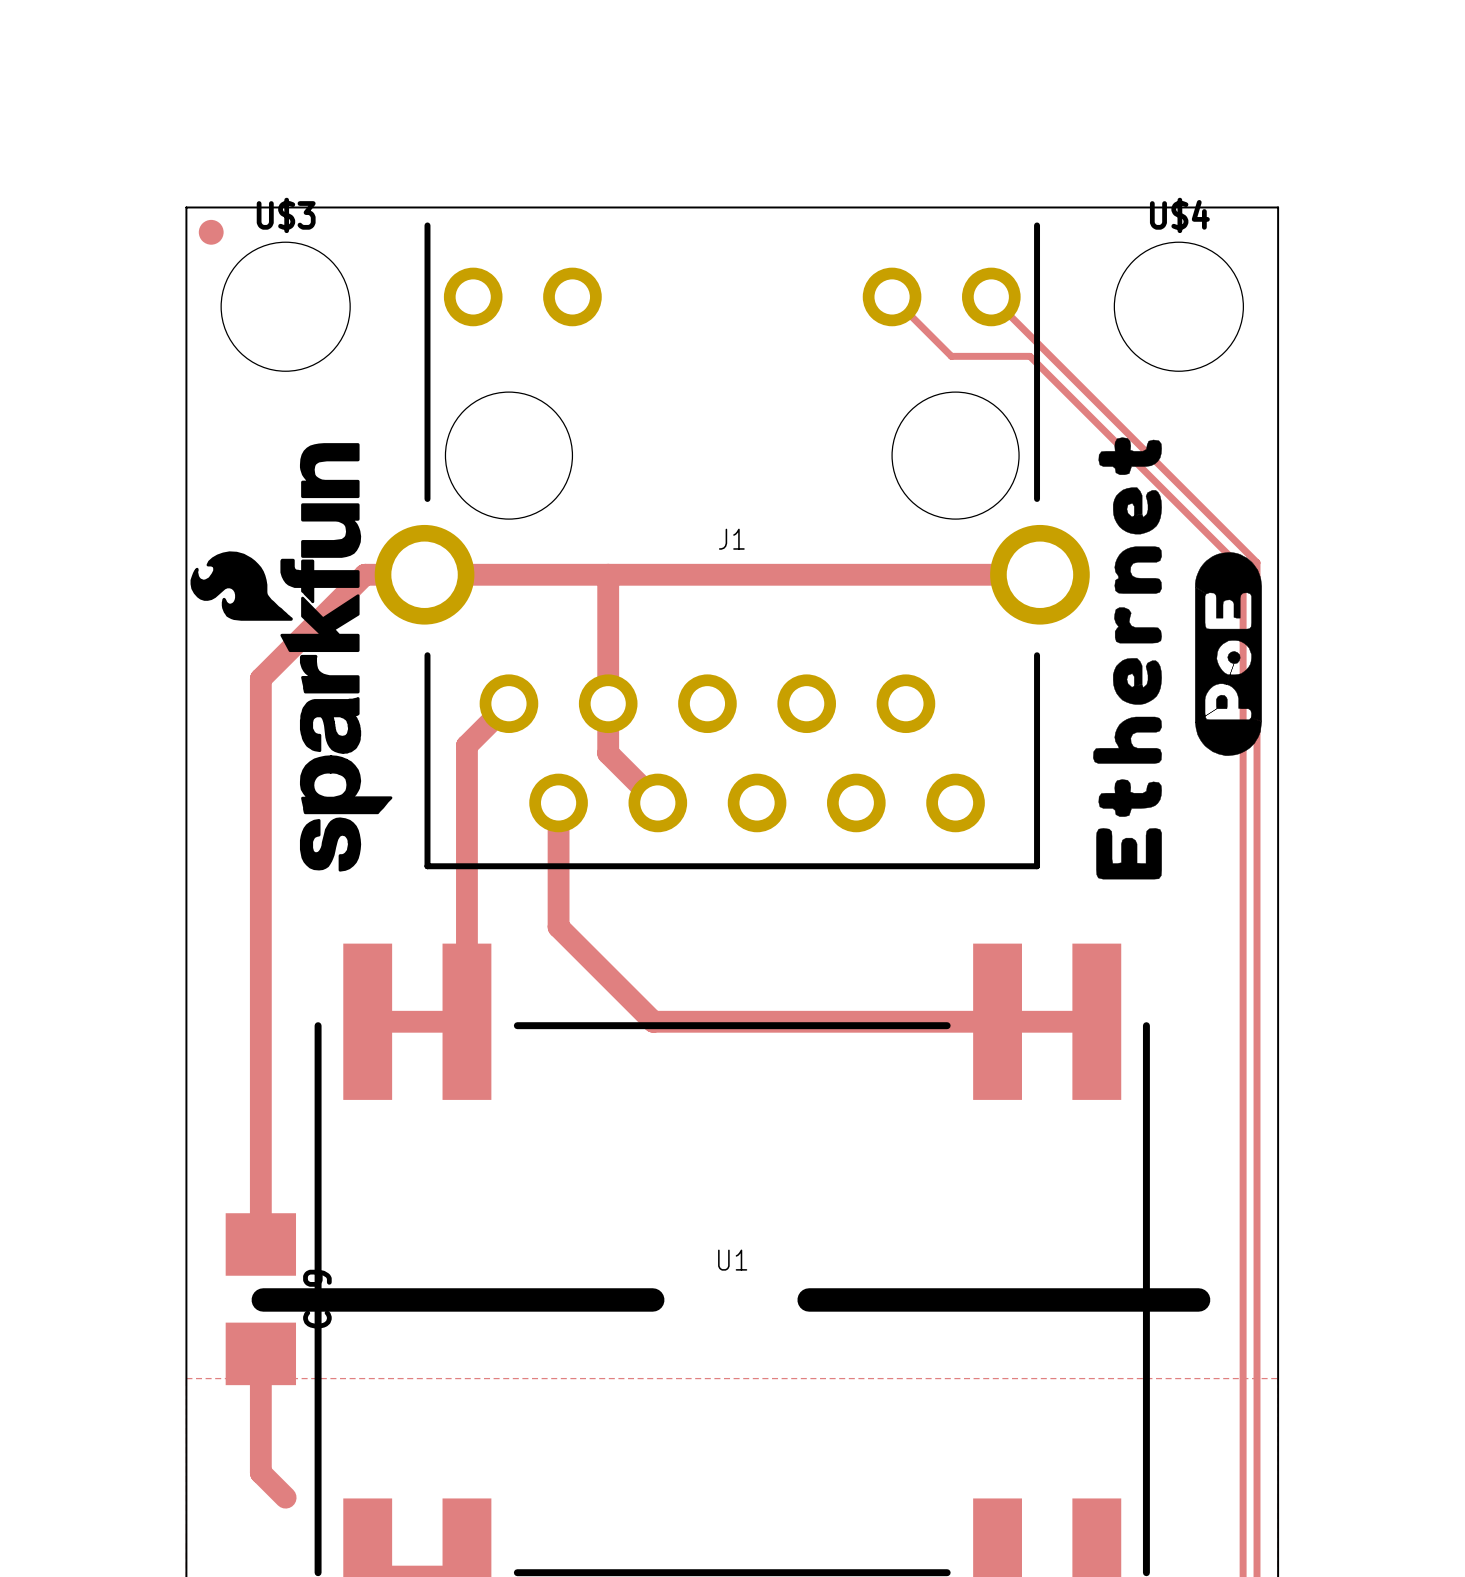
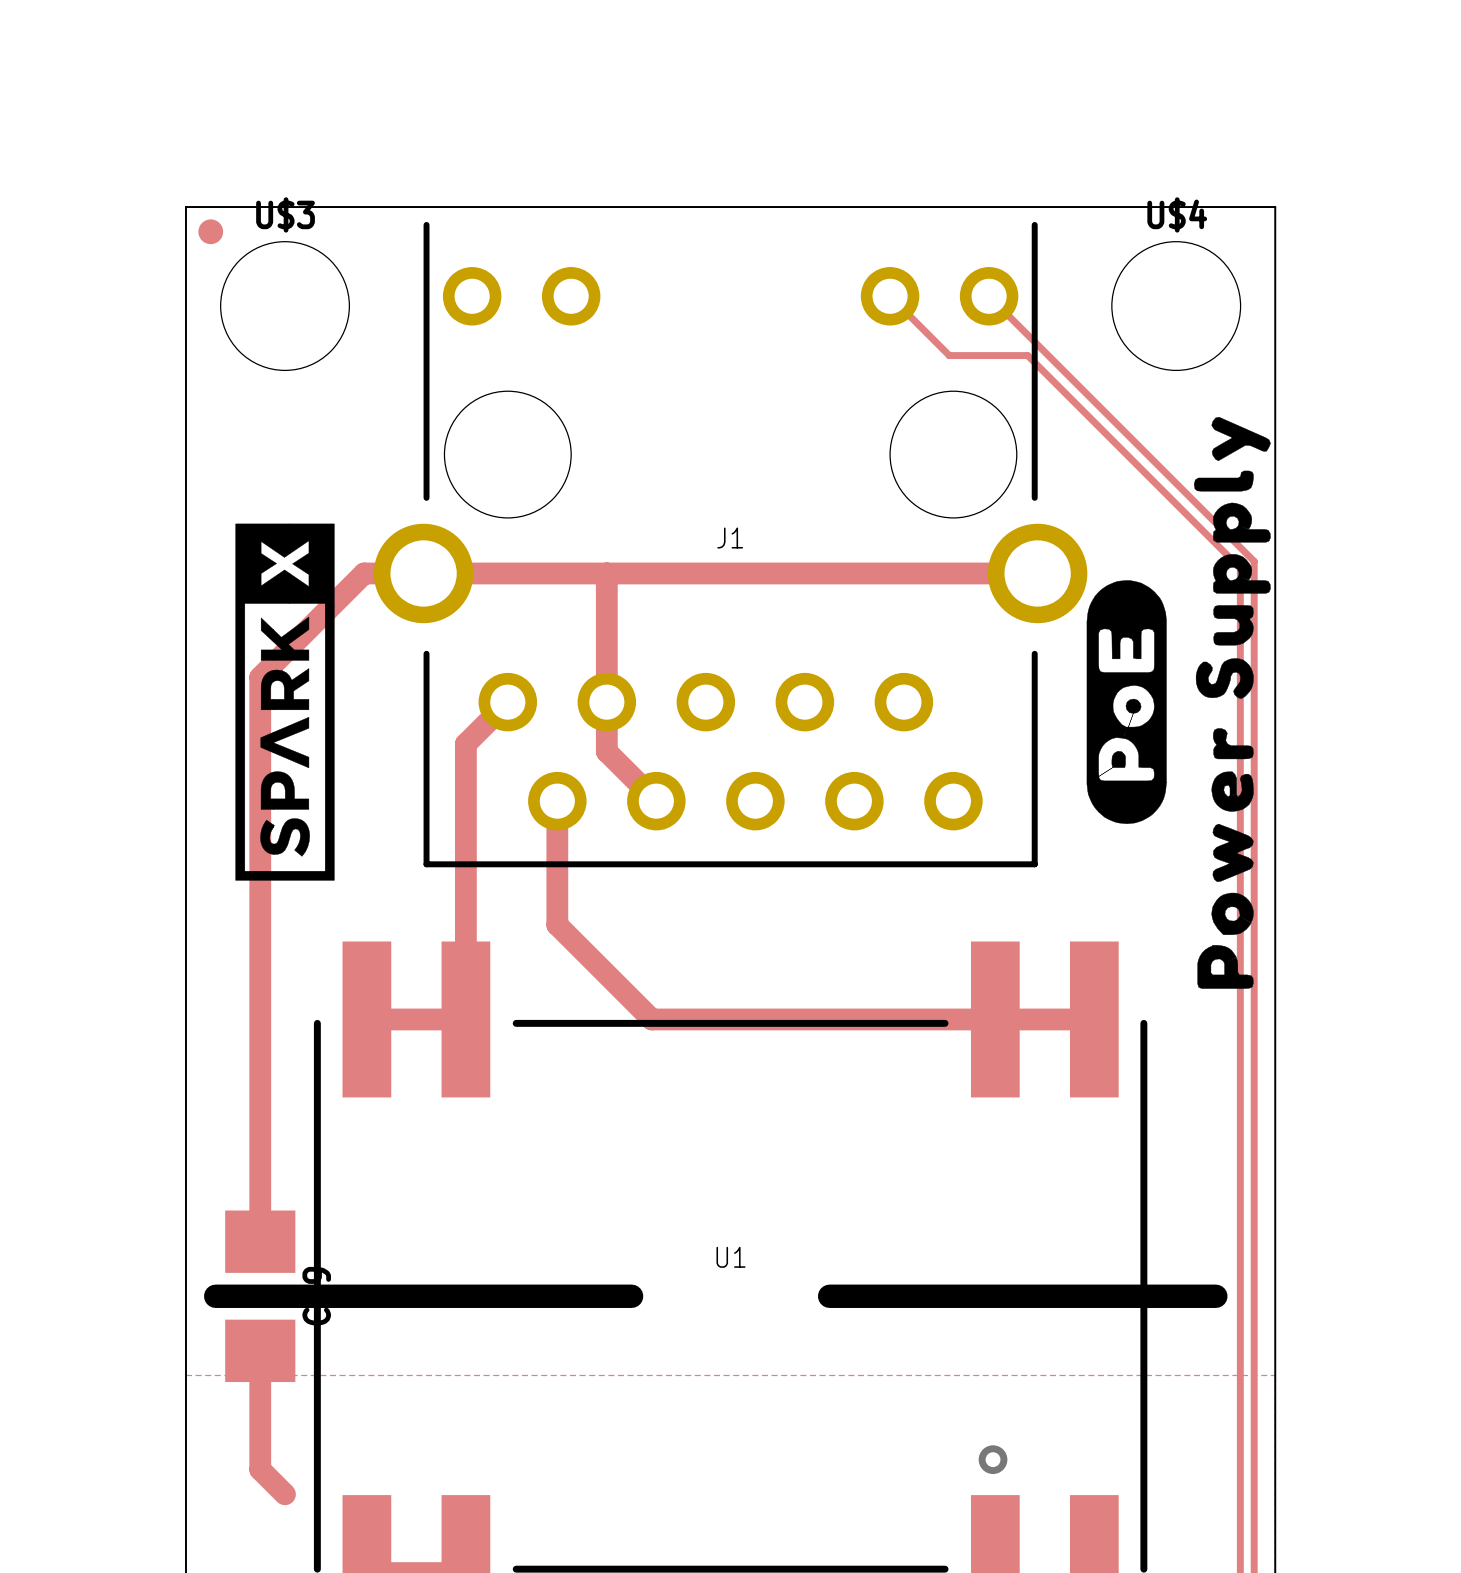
drawing: none -> [1086, 416, 1271, 989]
drawing: [1093, 437, 1262, 880] -> none
drawing: [190, 443, 393, 872] -> none
drawing: none -> [235, 523, 335, 881]
board edge: none -> (215, 1296) (631, 1296)
board edge: (263, 1299) (652, 1299) -> none
board edge: (809, 1299) (1198, 1299) -> none
board edge: none -> (829, 1296) (1215, 1296)
via: none -> (993, 1459)

